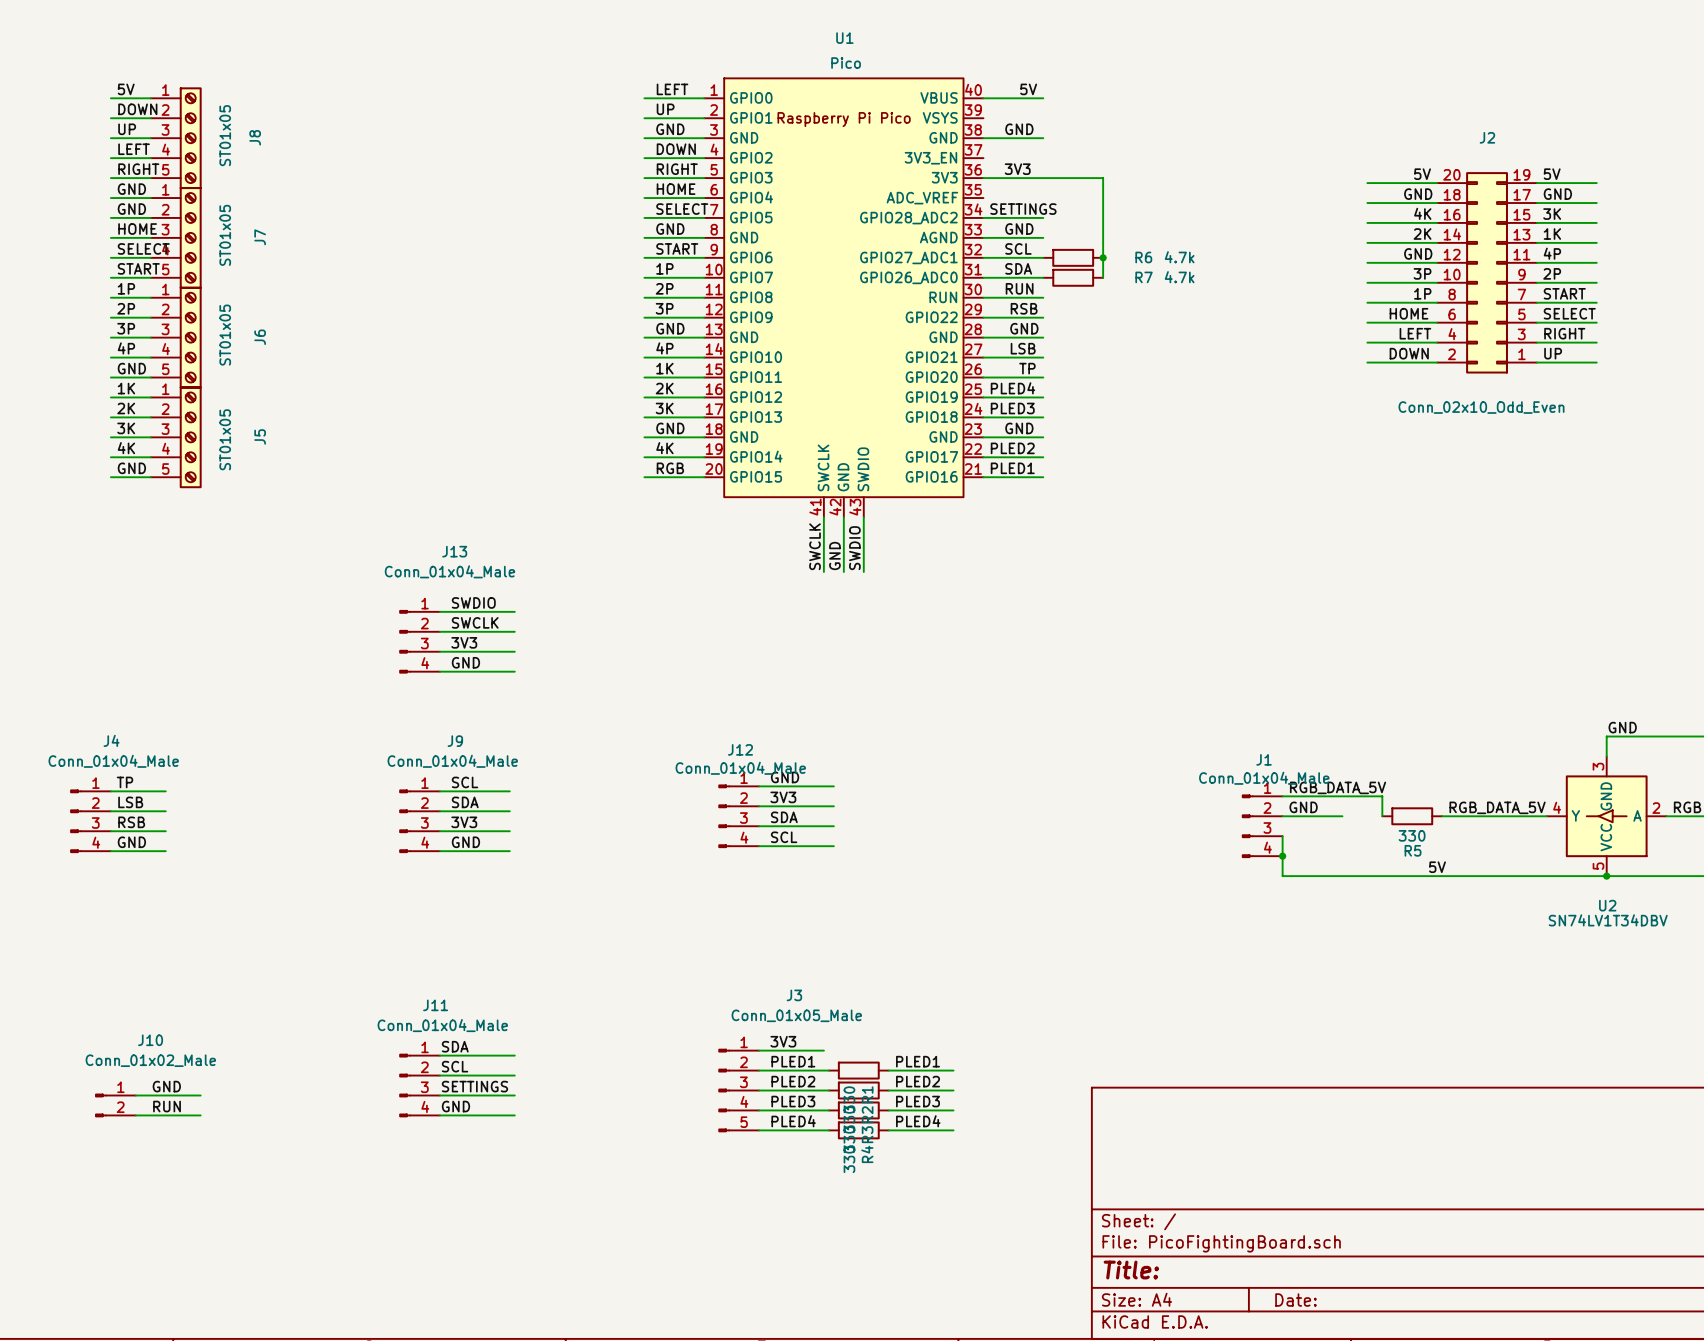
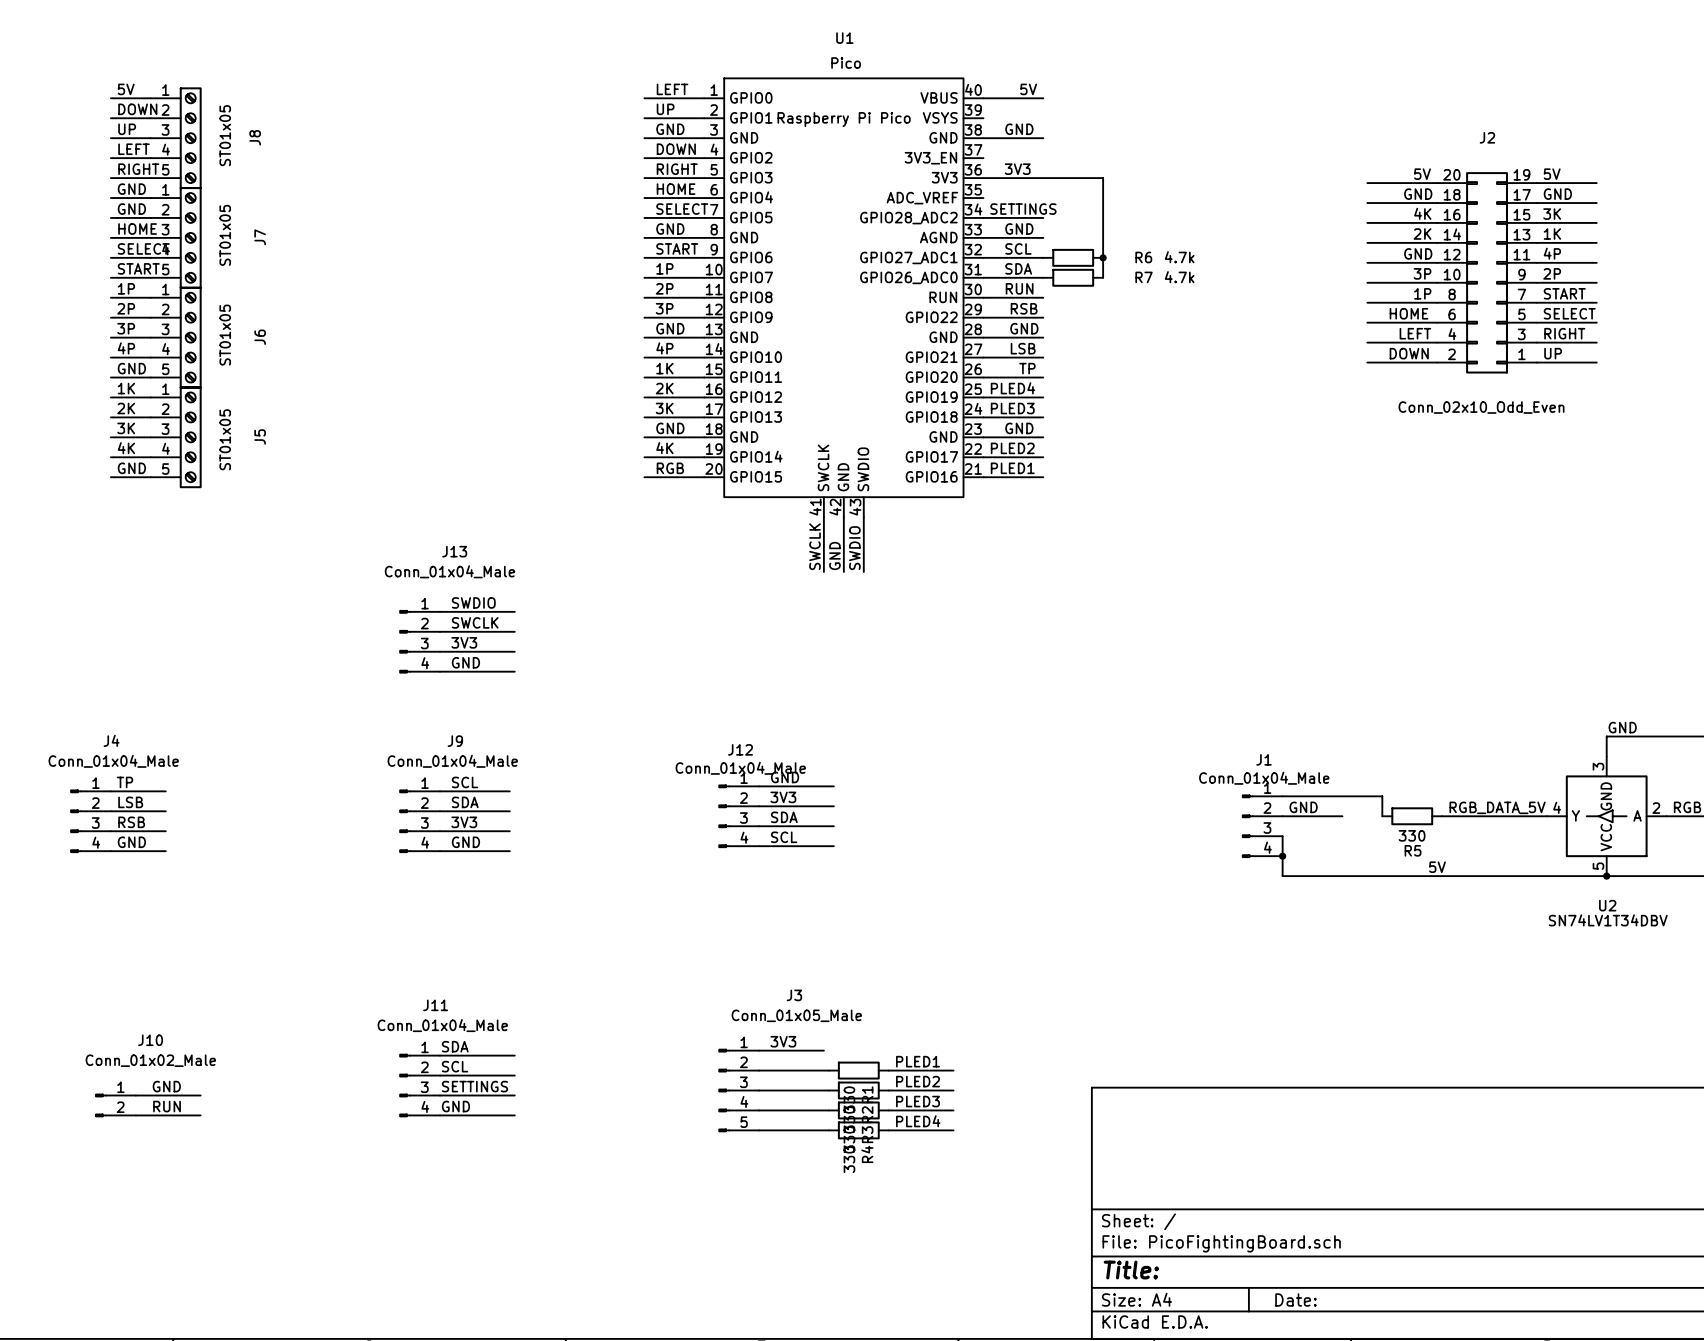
label: RGB_DATA_5V (1338, 787) -> none
label: PLED1 (793, 1061) -> none
label: PLED2 (793, 1081) -> none
label: PLED3 (793, 1101) -> none
label: PLED4 (793, 1121) -> none

